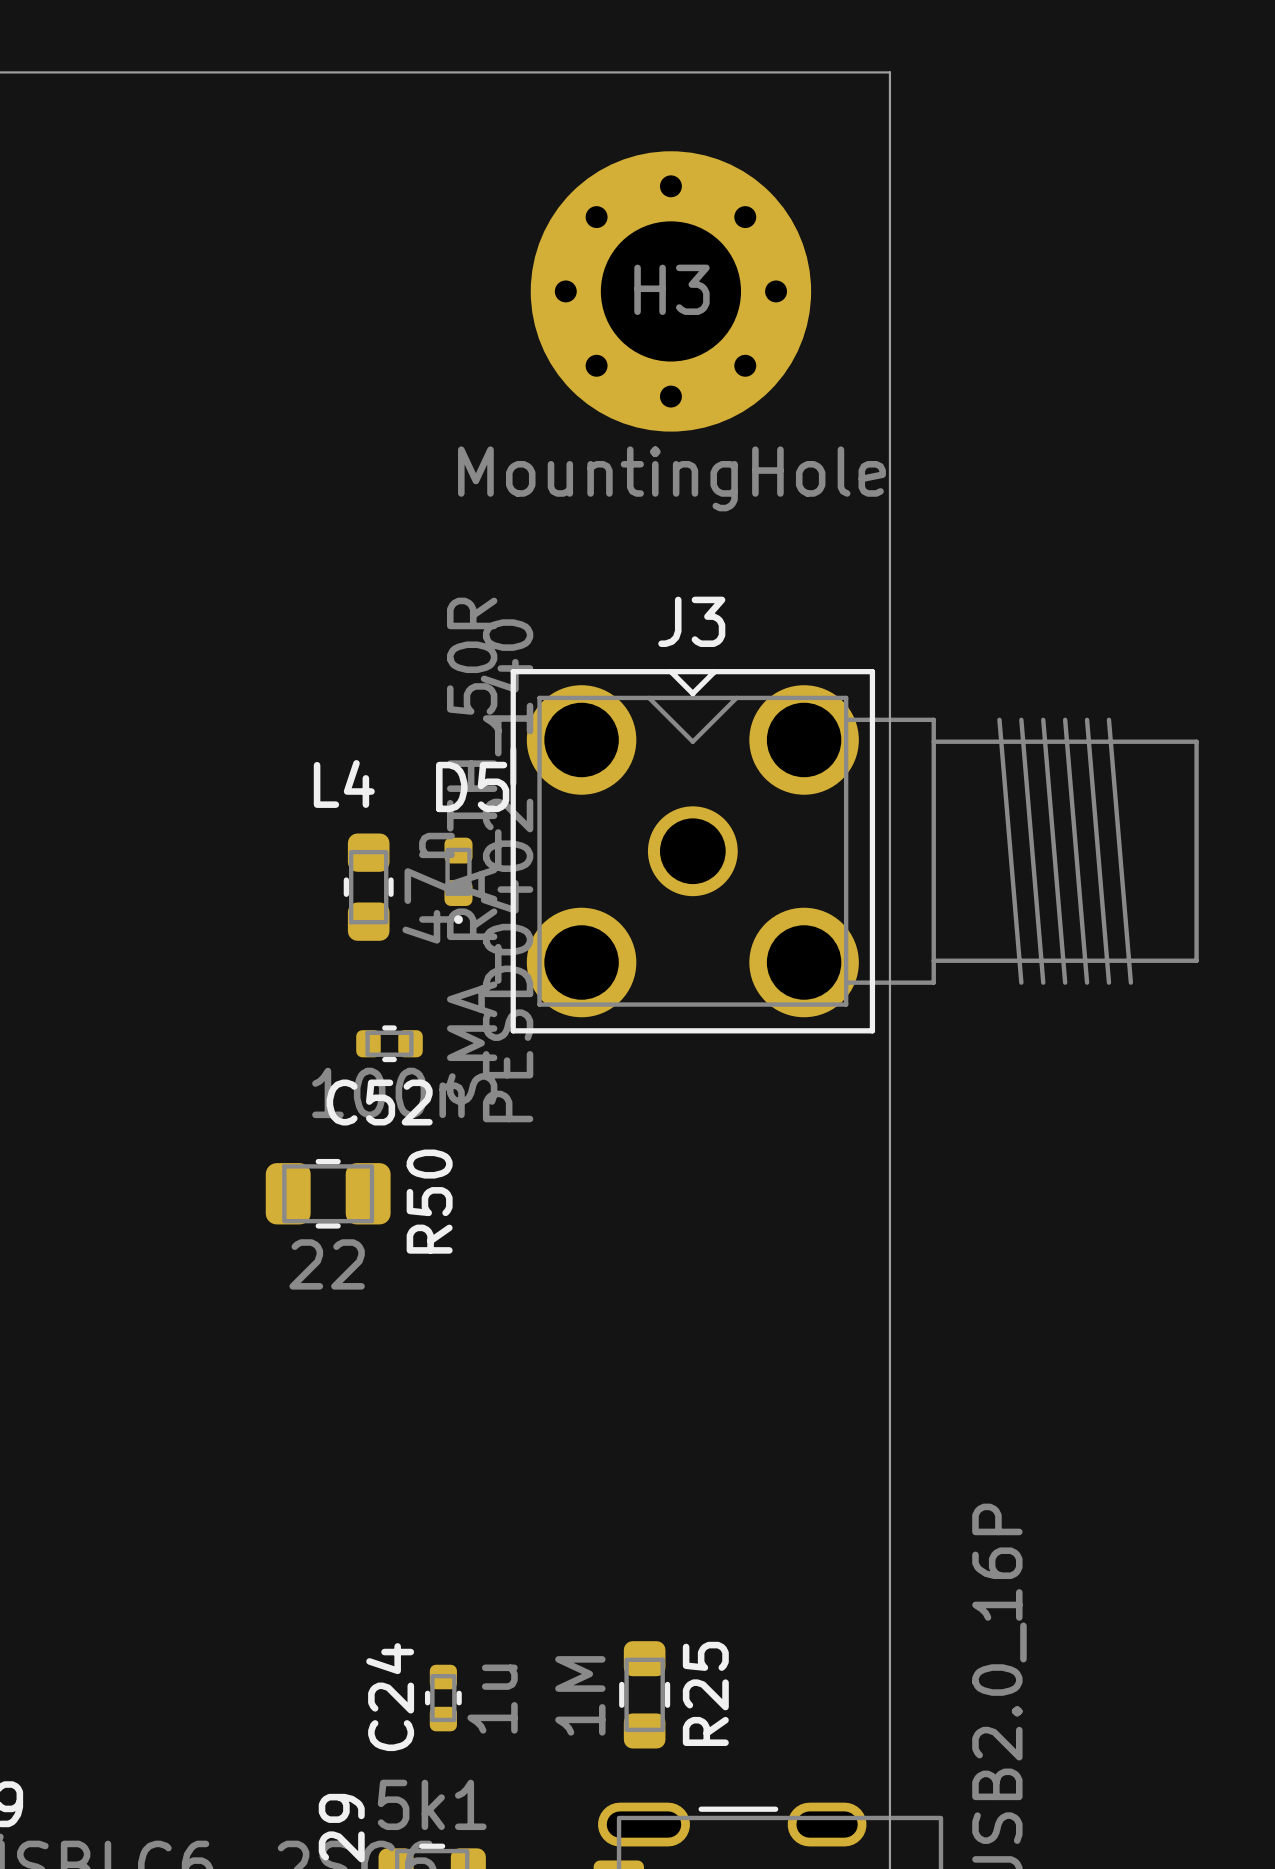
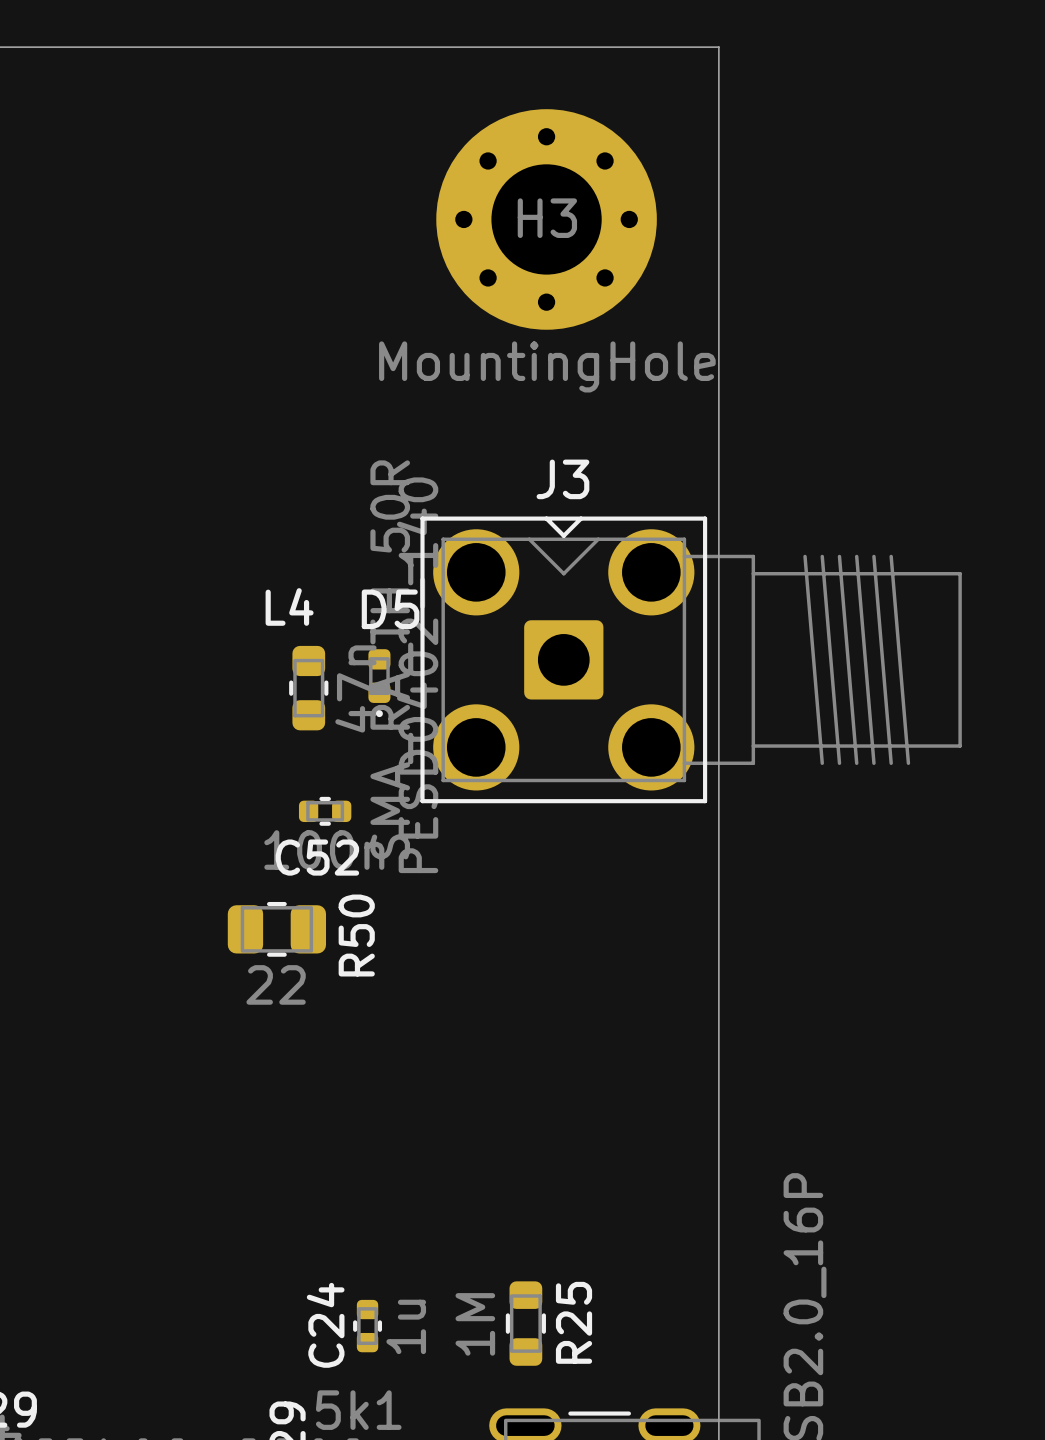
J3 footprint: [510, 669, 1199, 1034] -> [420, 516, 962, 804]

